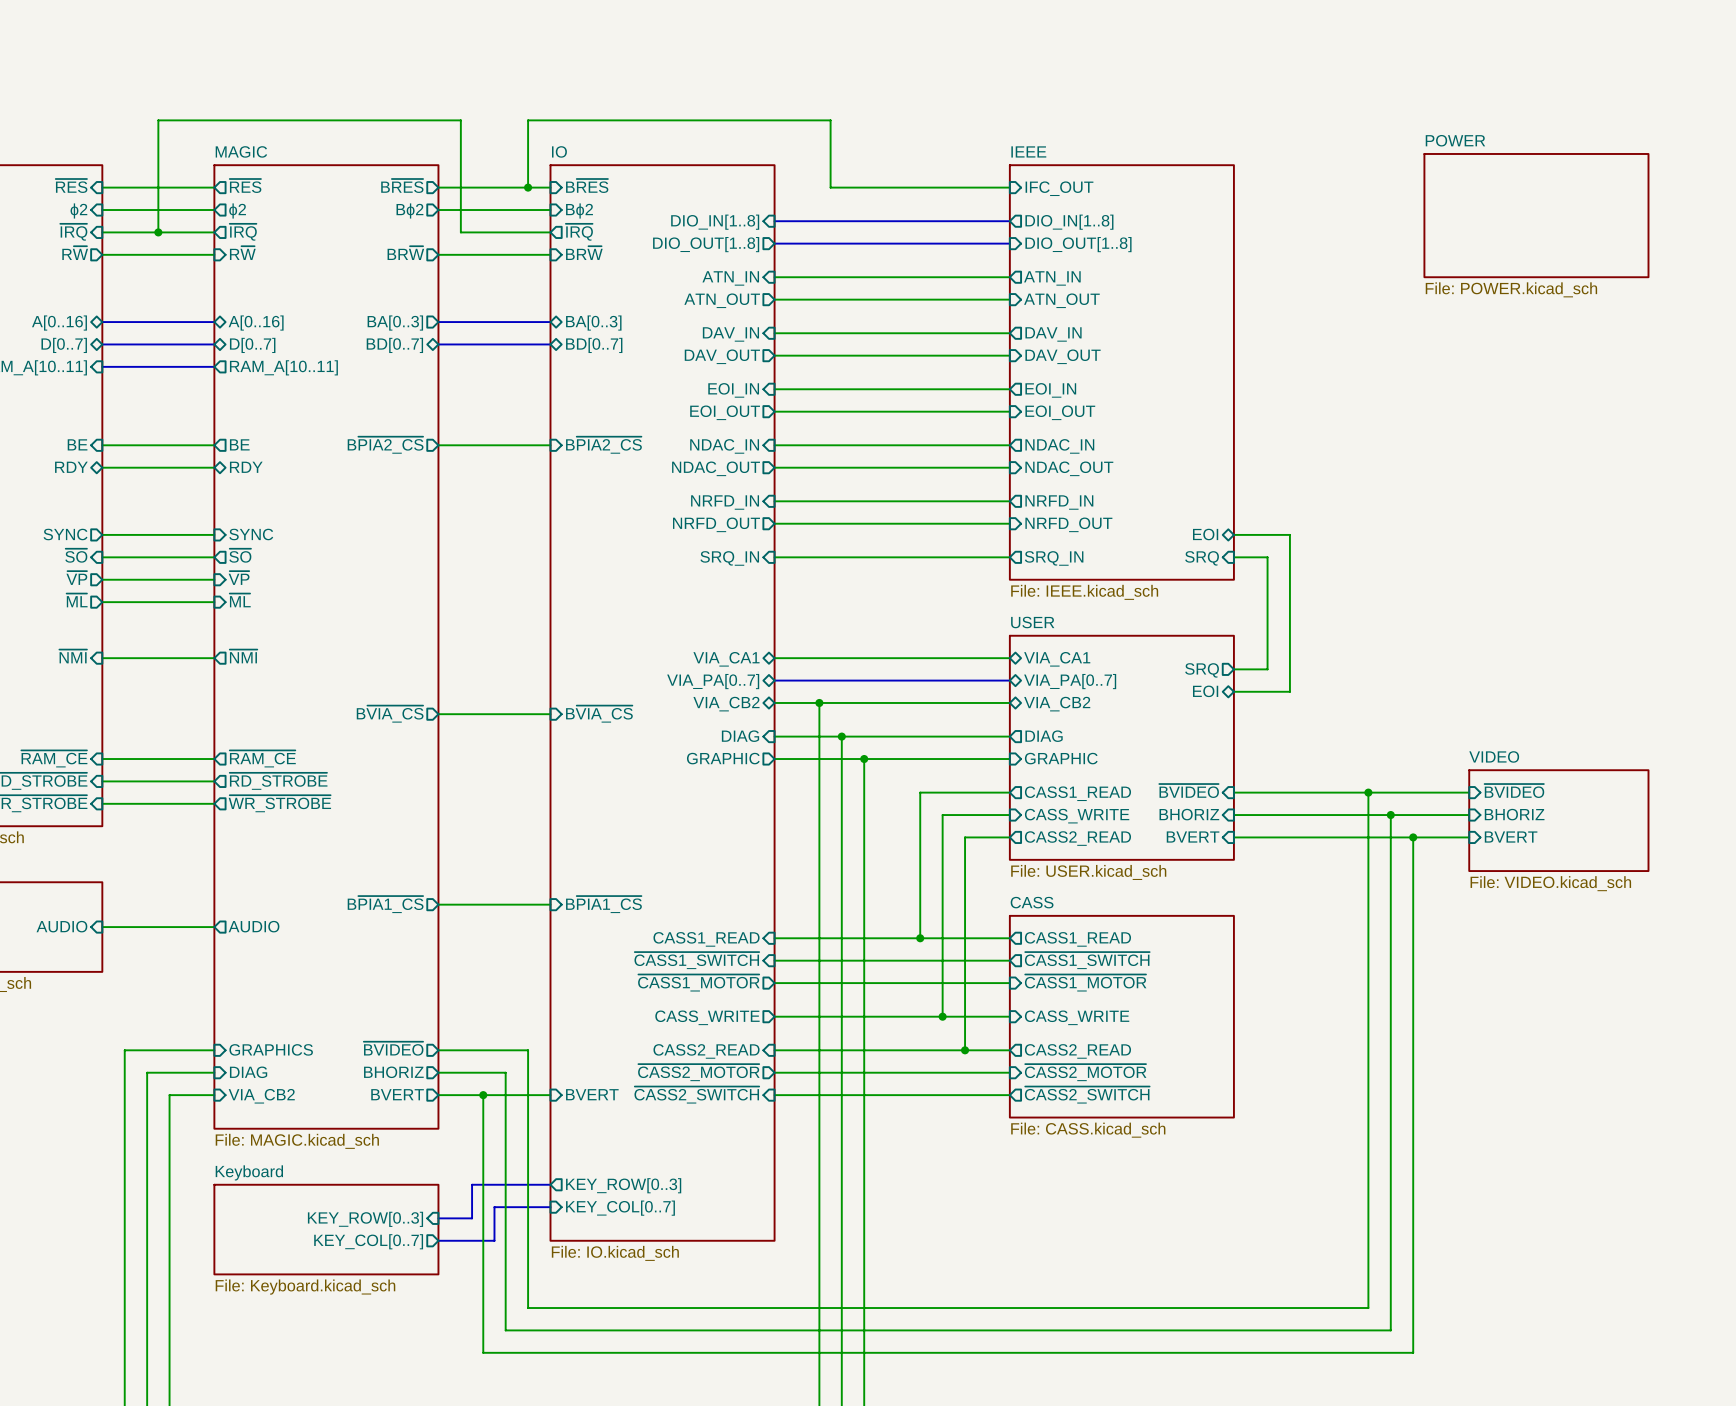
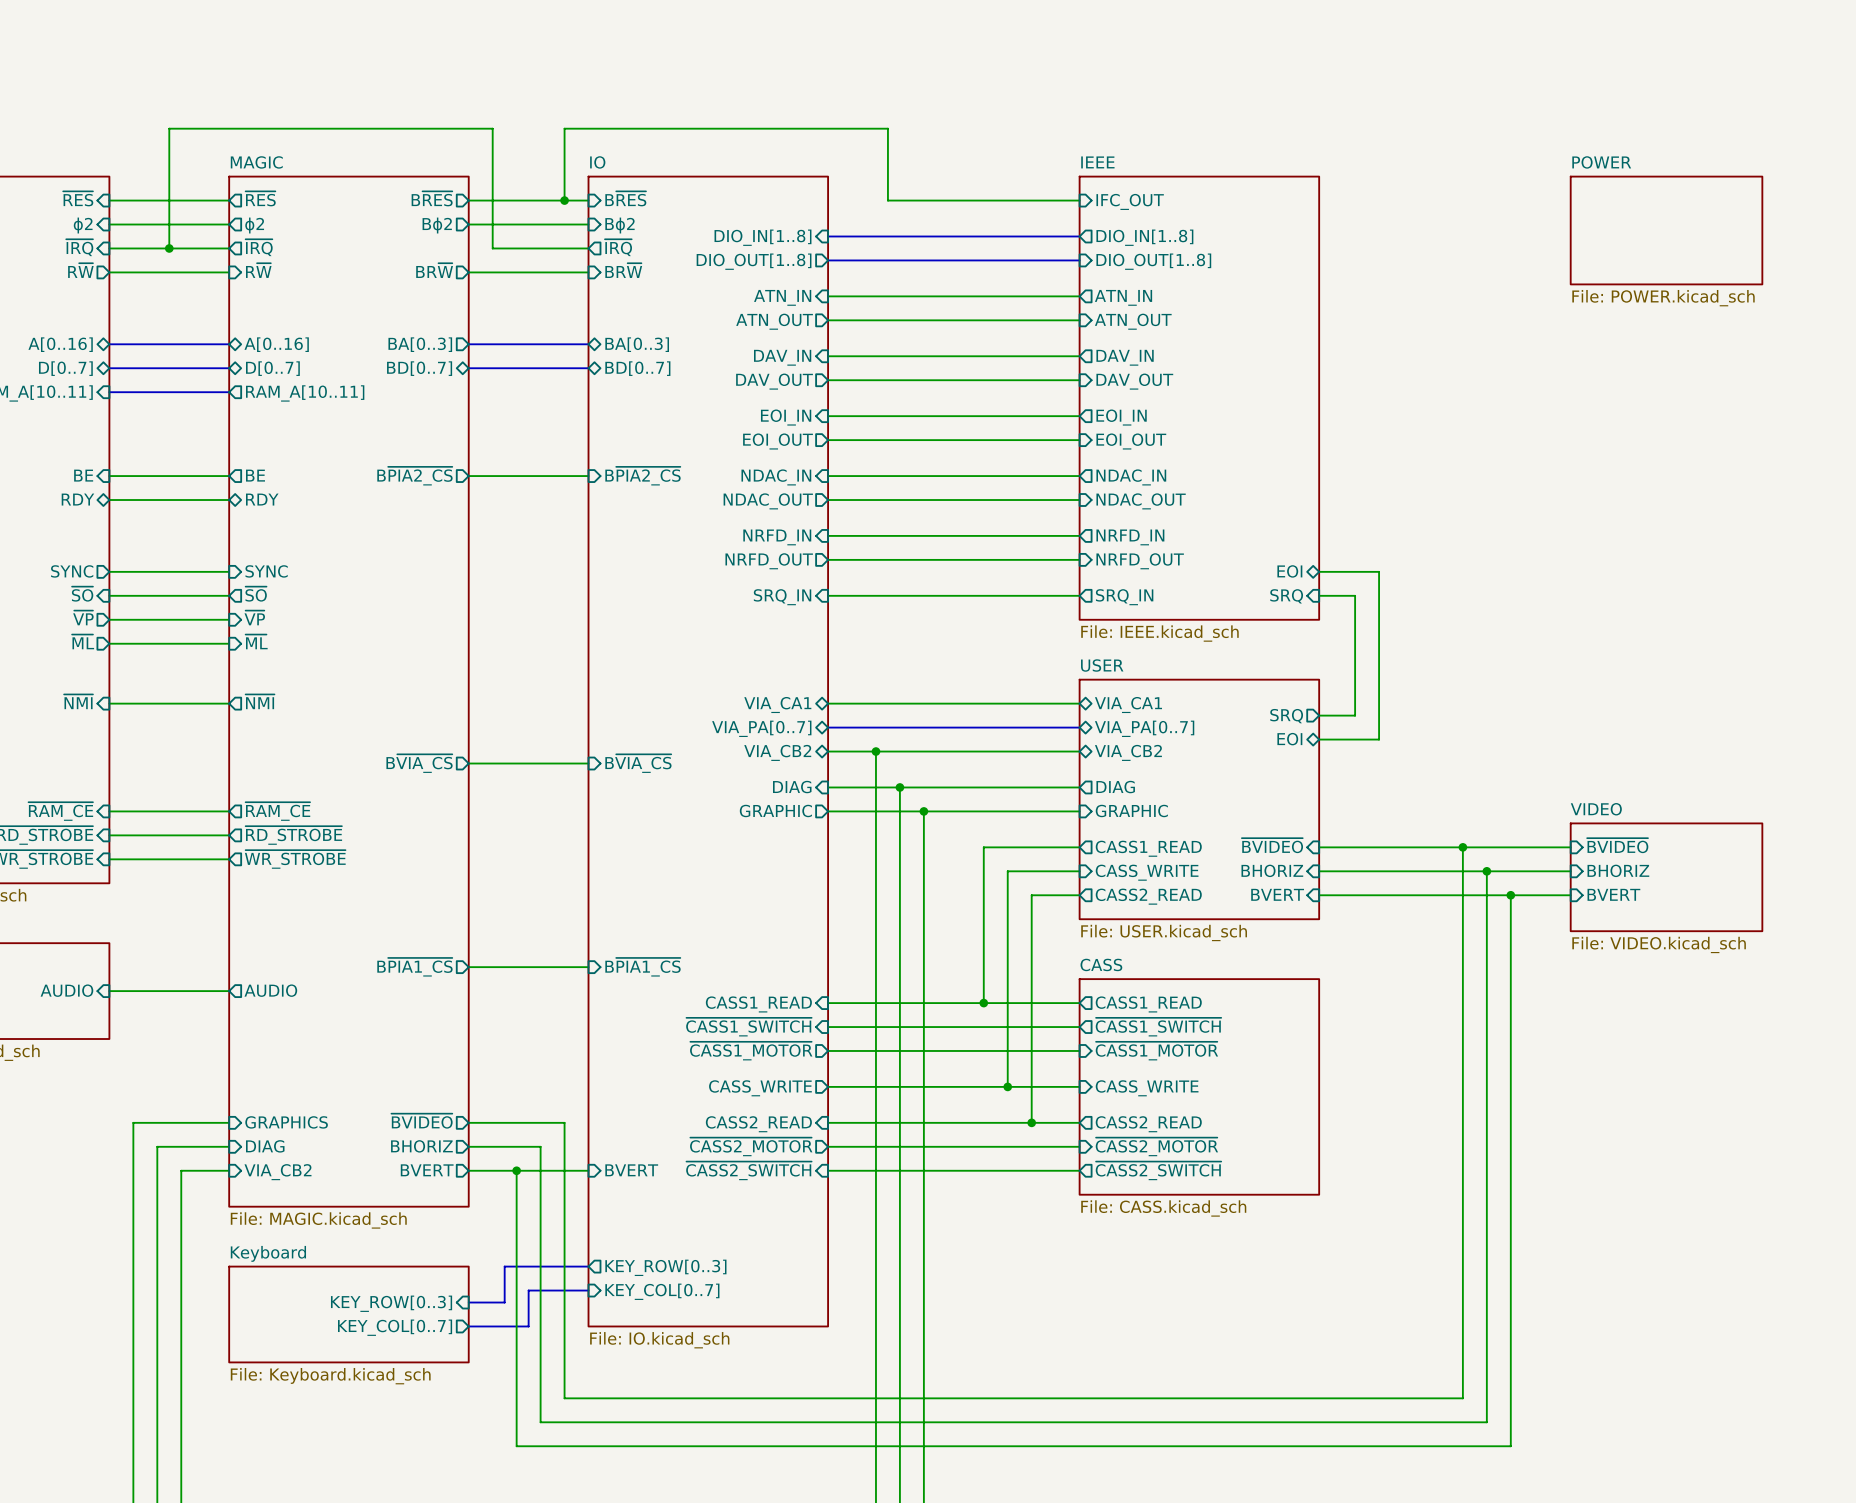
sheet POWER: File: POWER.kicad_sch (1536, 215) -> none
sheet POWER: none -> File: POWER.kicad_sch (1666, 230)

